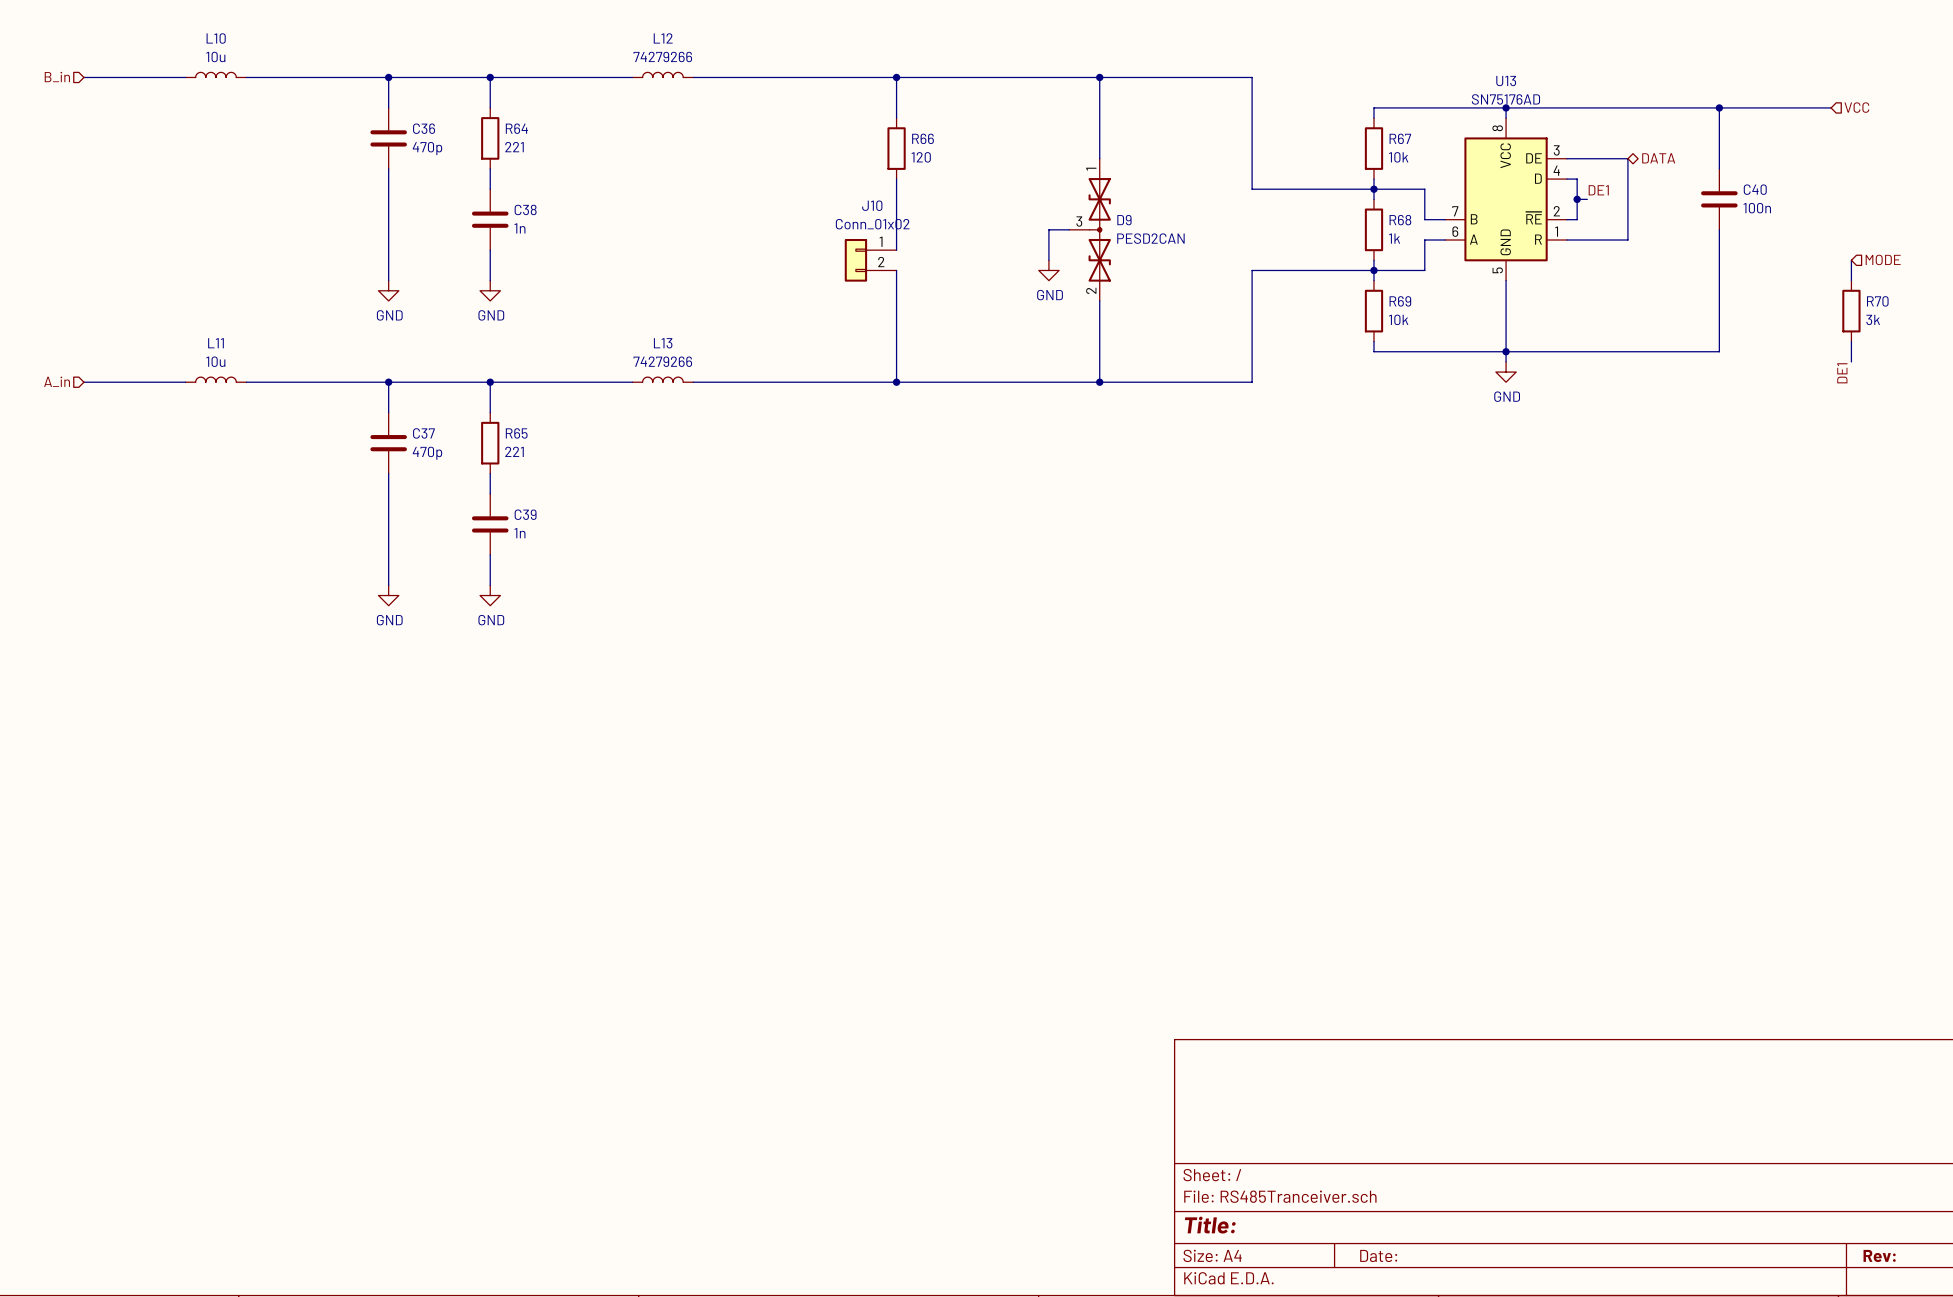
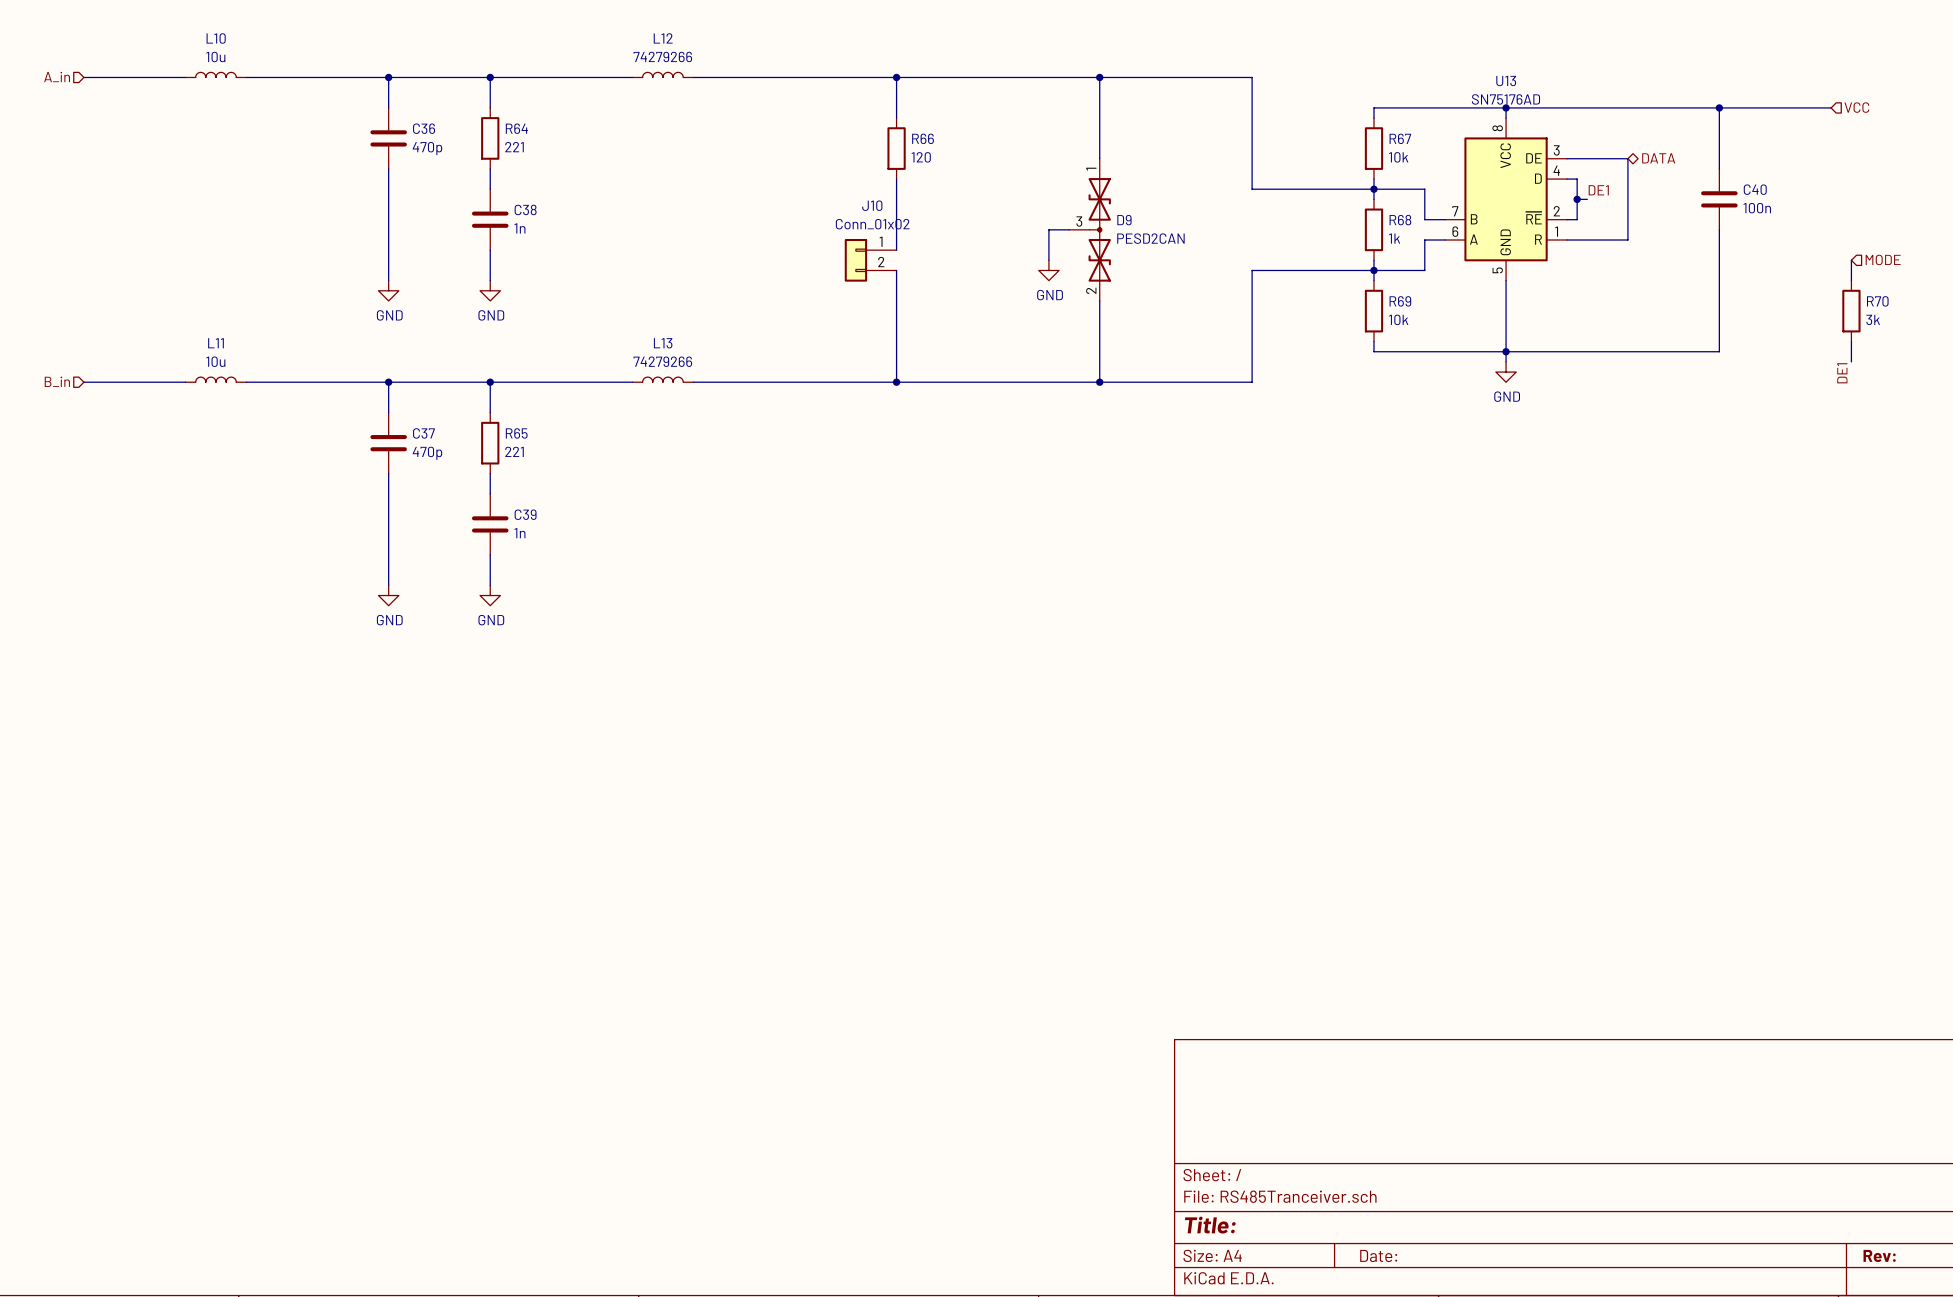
hierarchical label: B_in (57, 77) -> A_in (57, 77)
hierarchical label: A_in (57, 381) -> B_in (57, 381)

